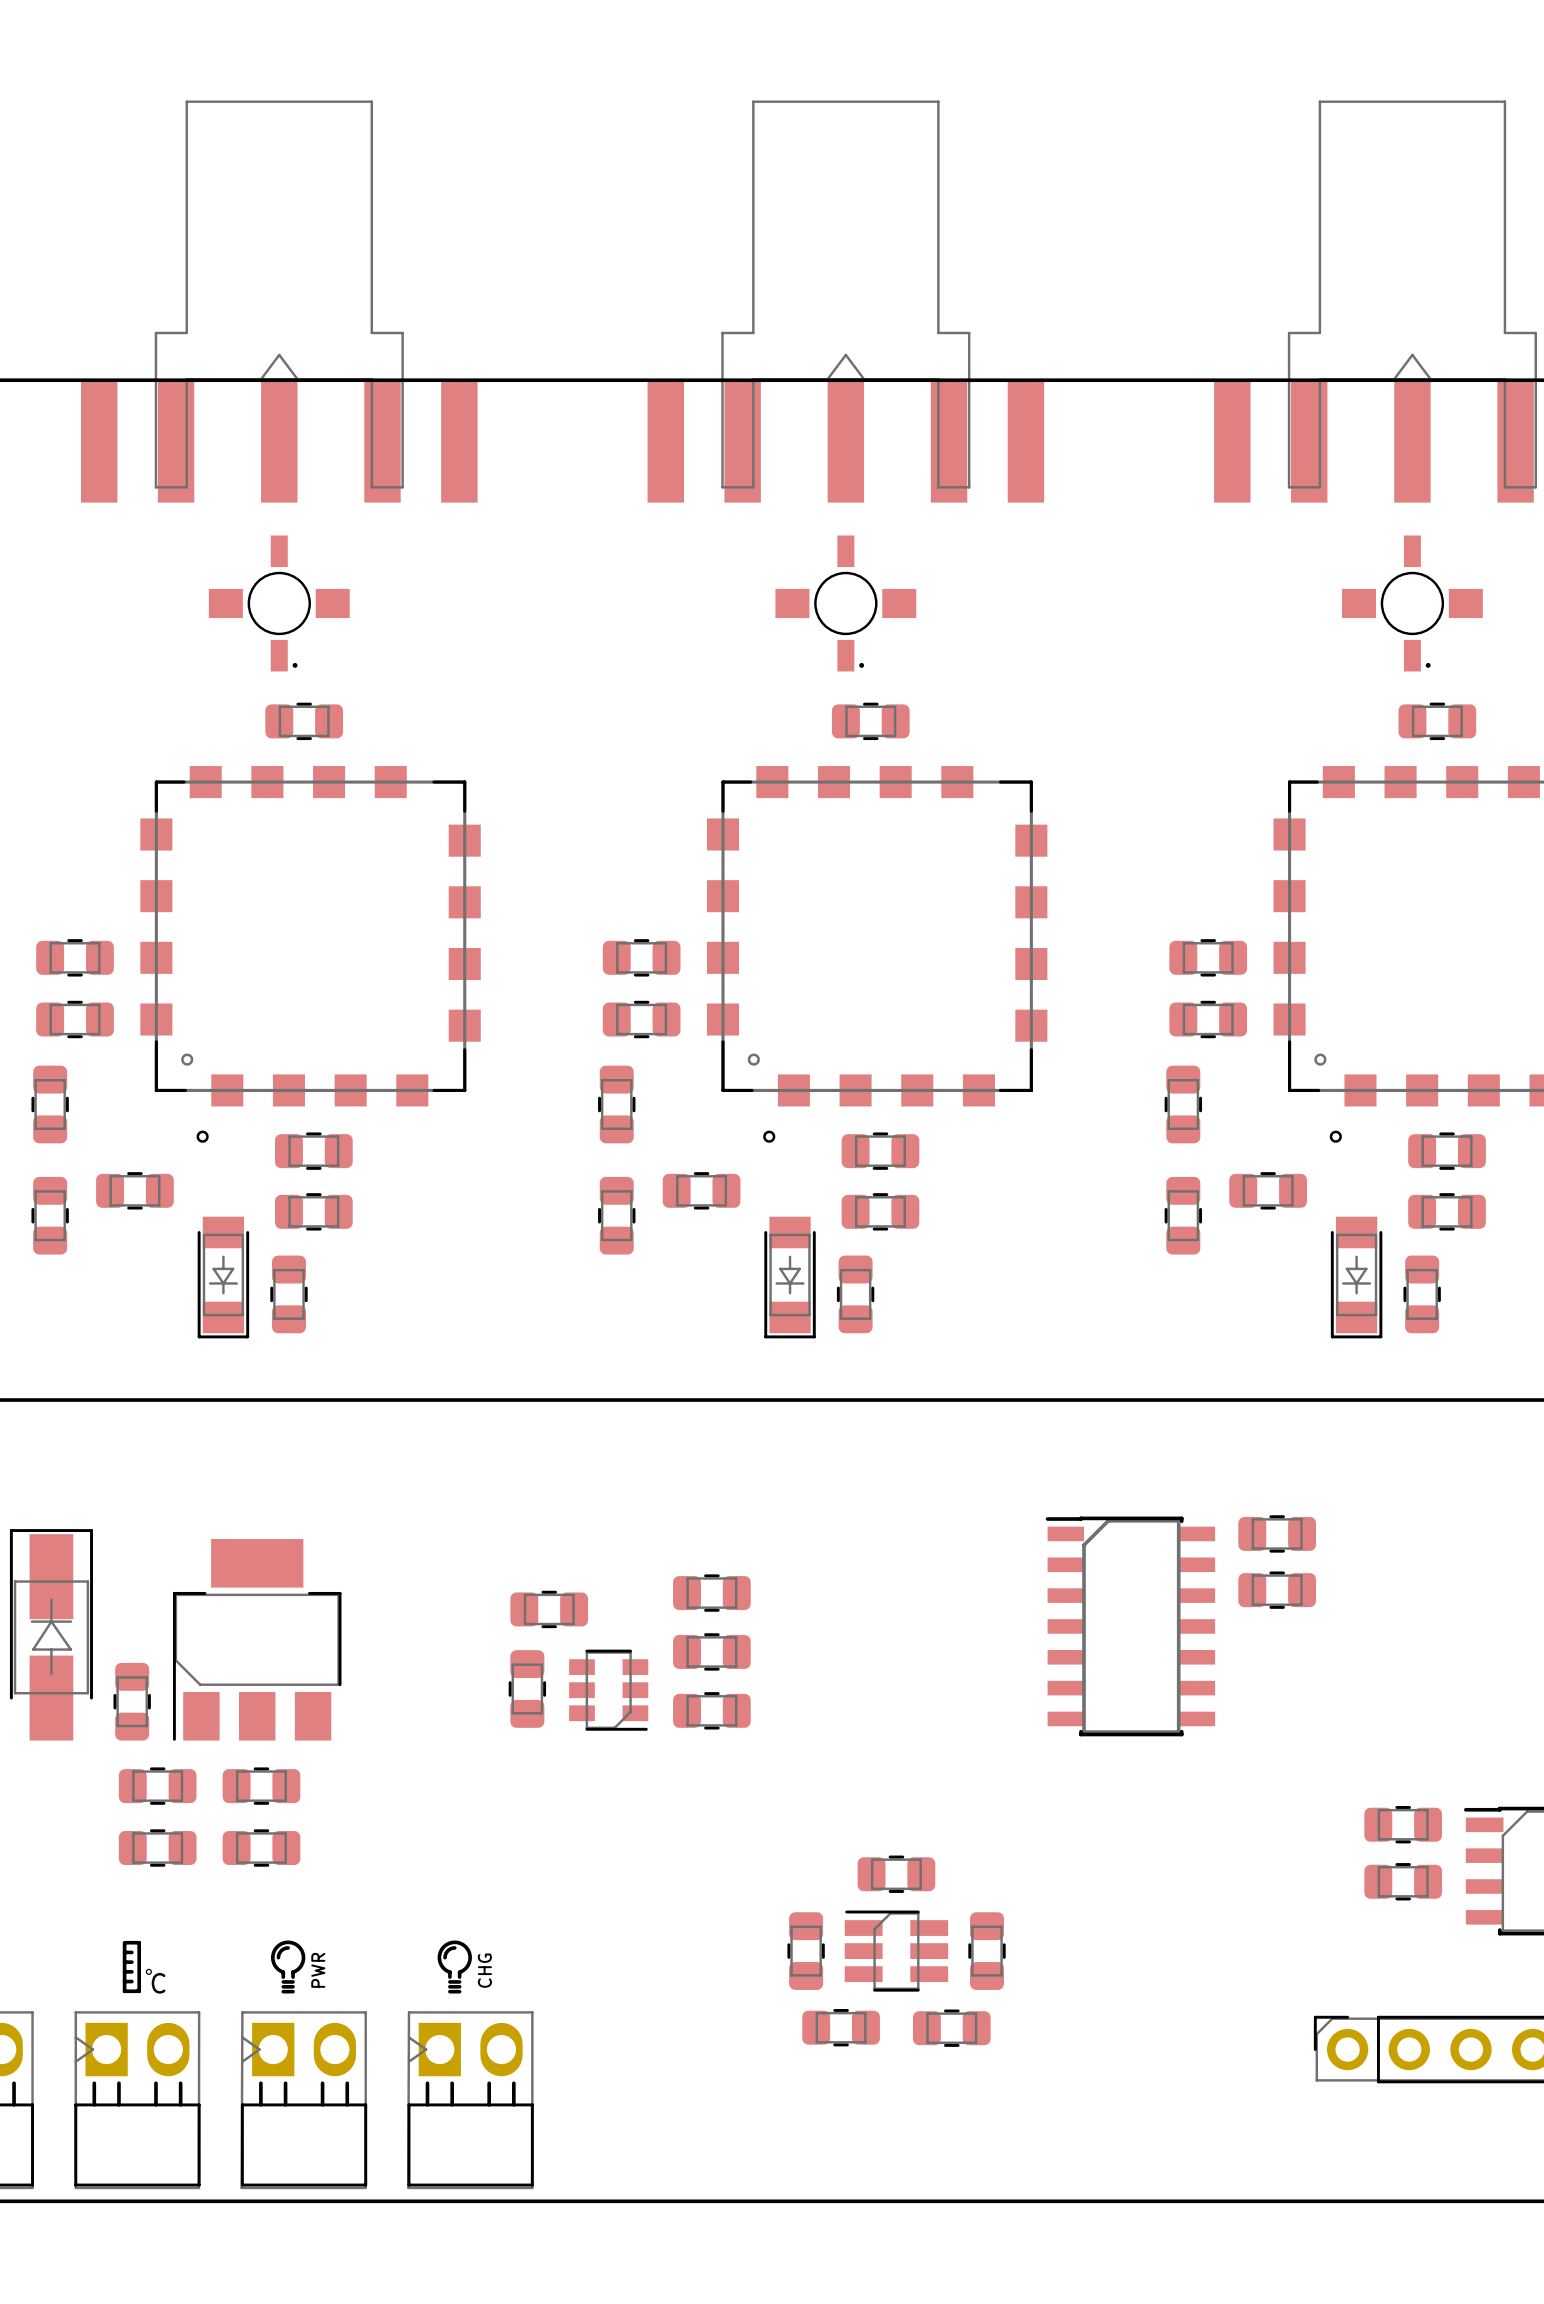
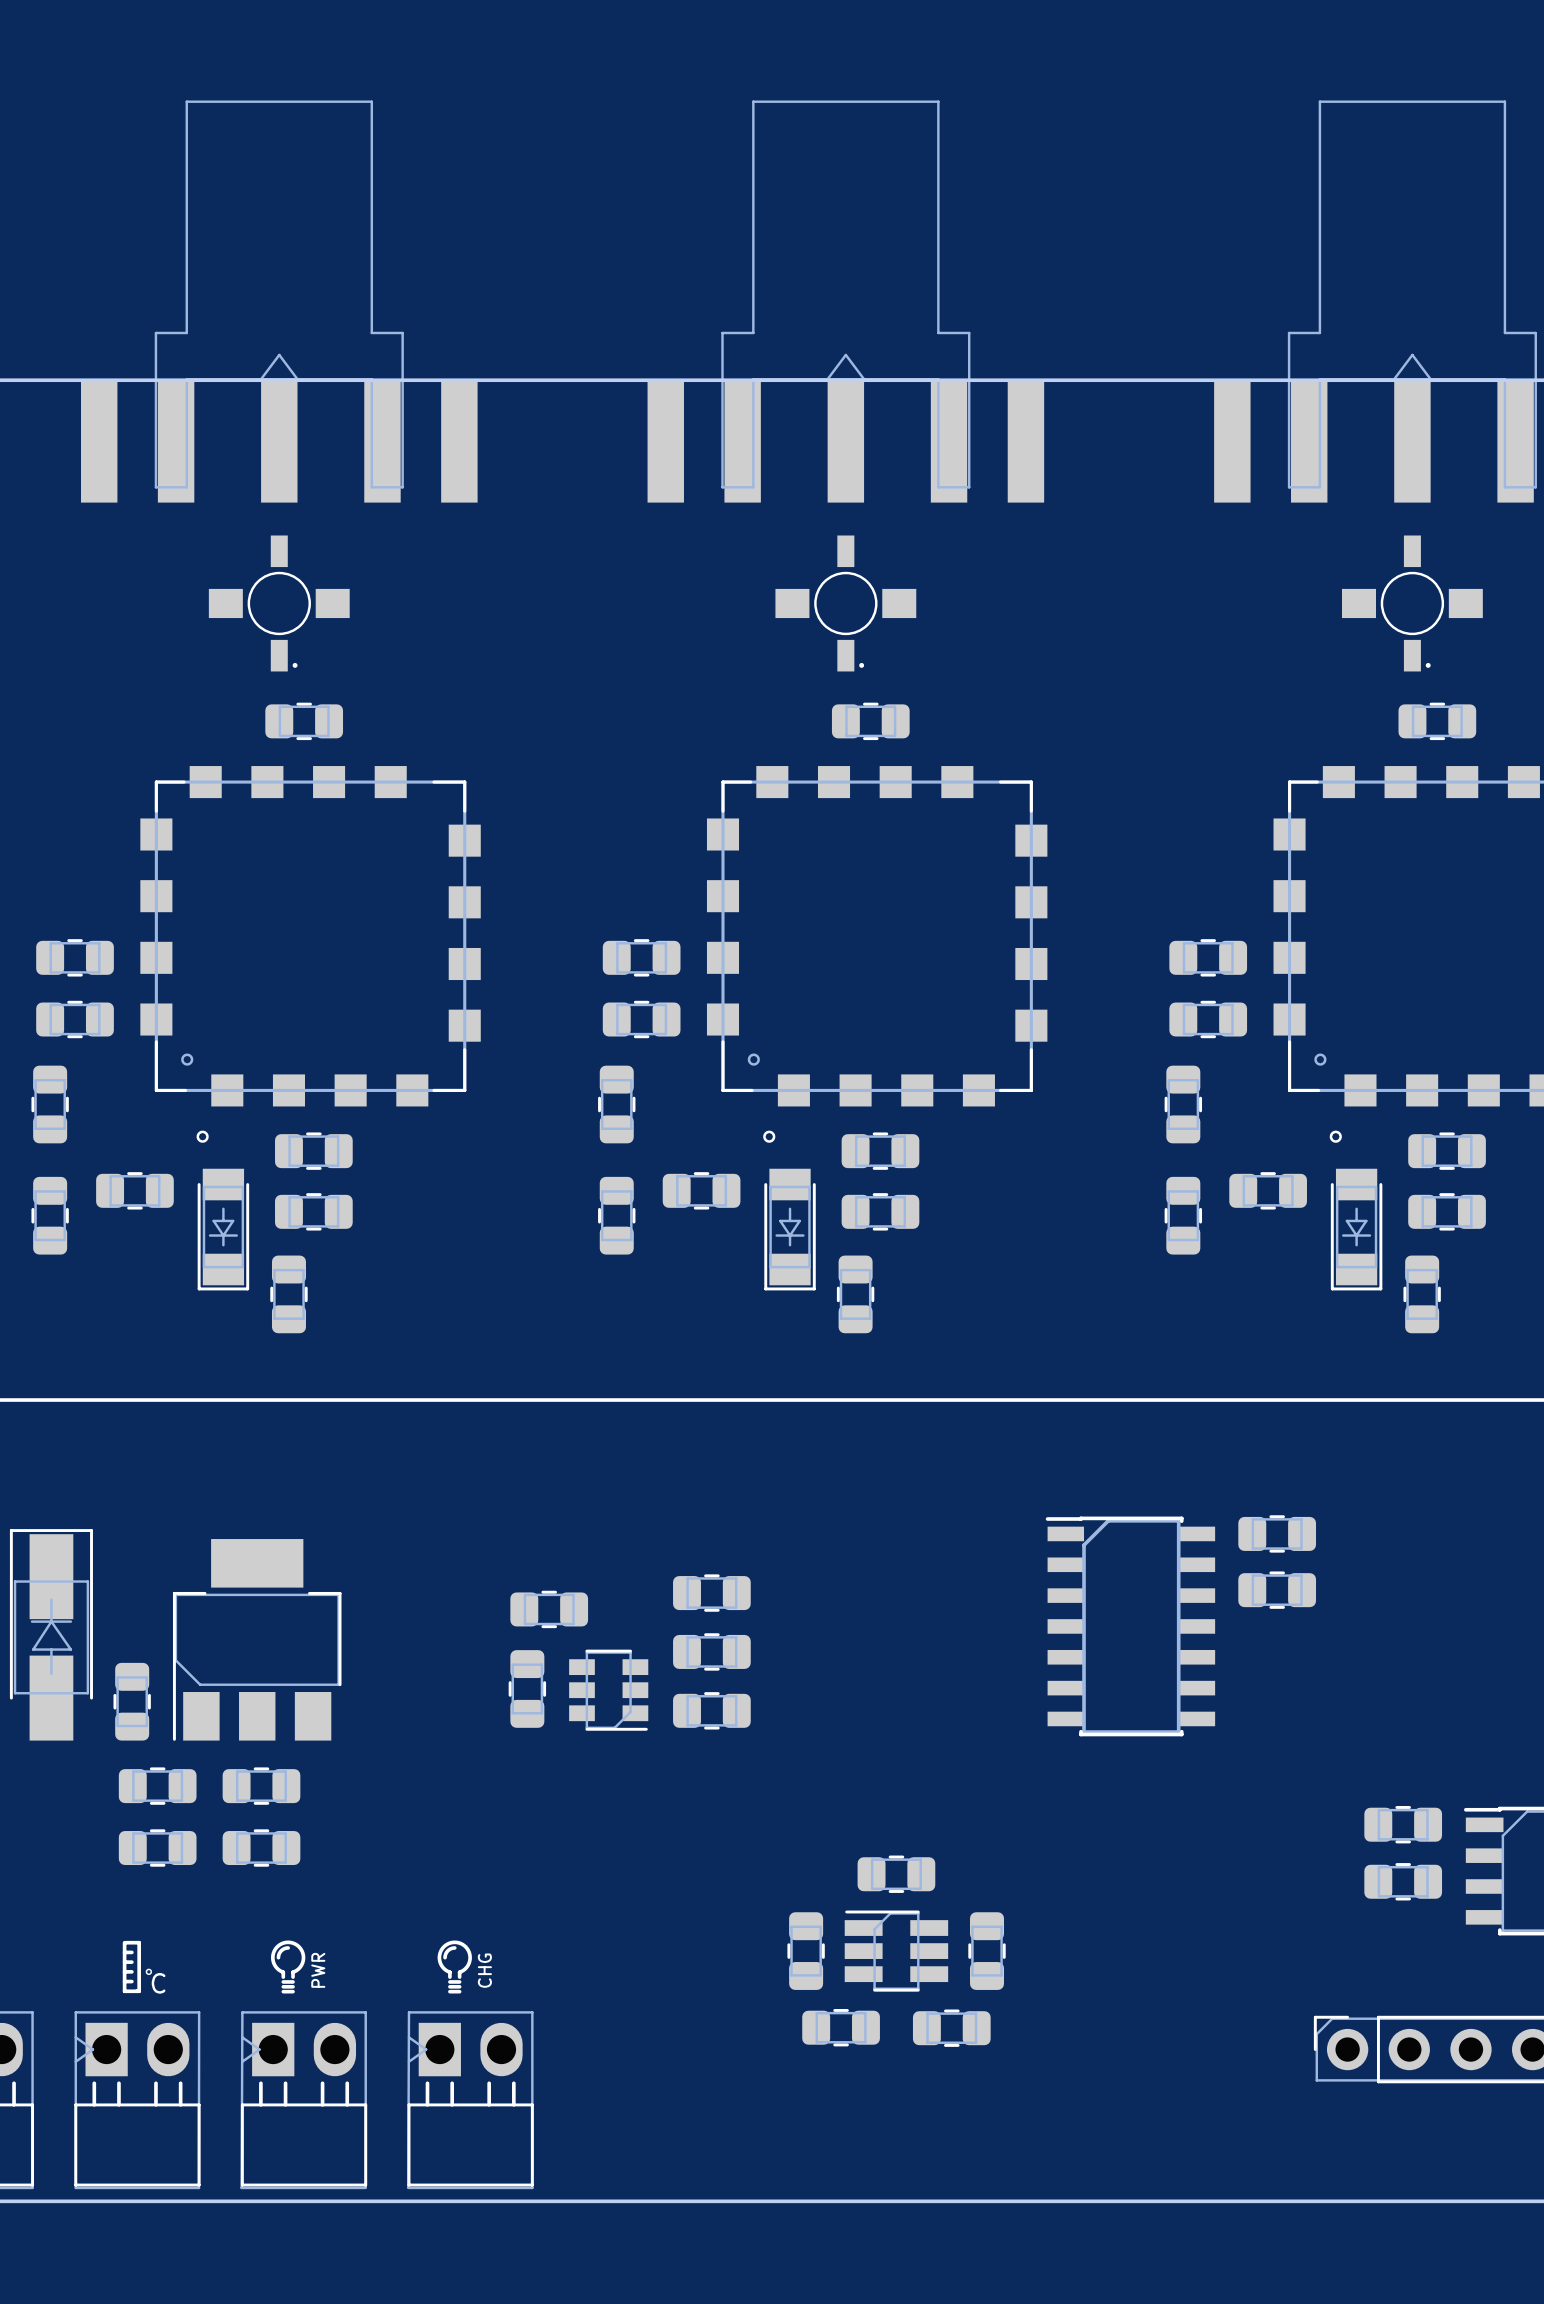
part position: (223, 1277) -> (223, 1229)
part position: (790, 1277) -> (790, 1229)
part position: (1356, 1277) -> (1356, 1229)

